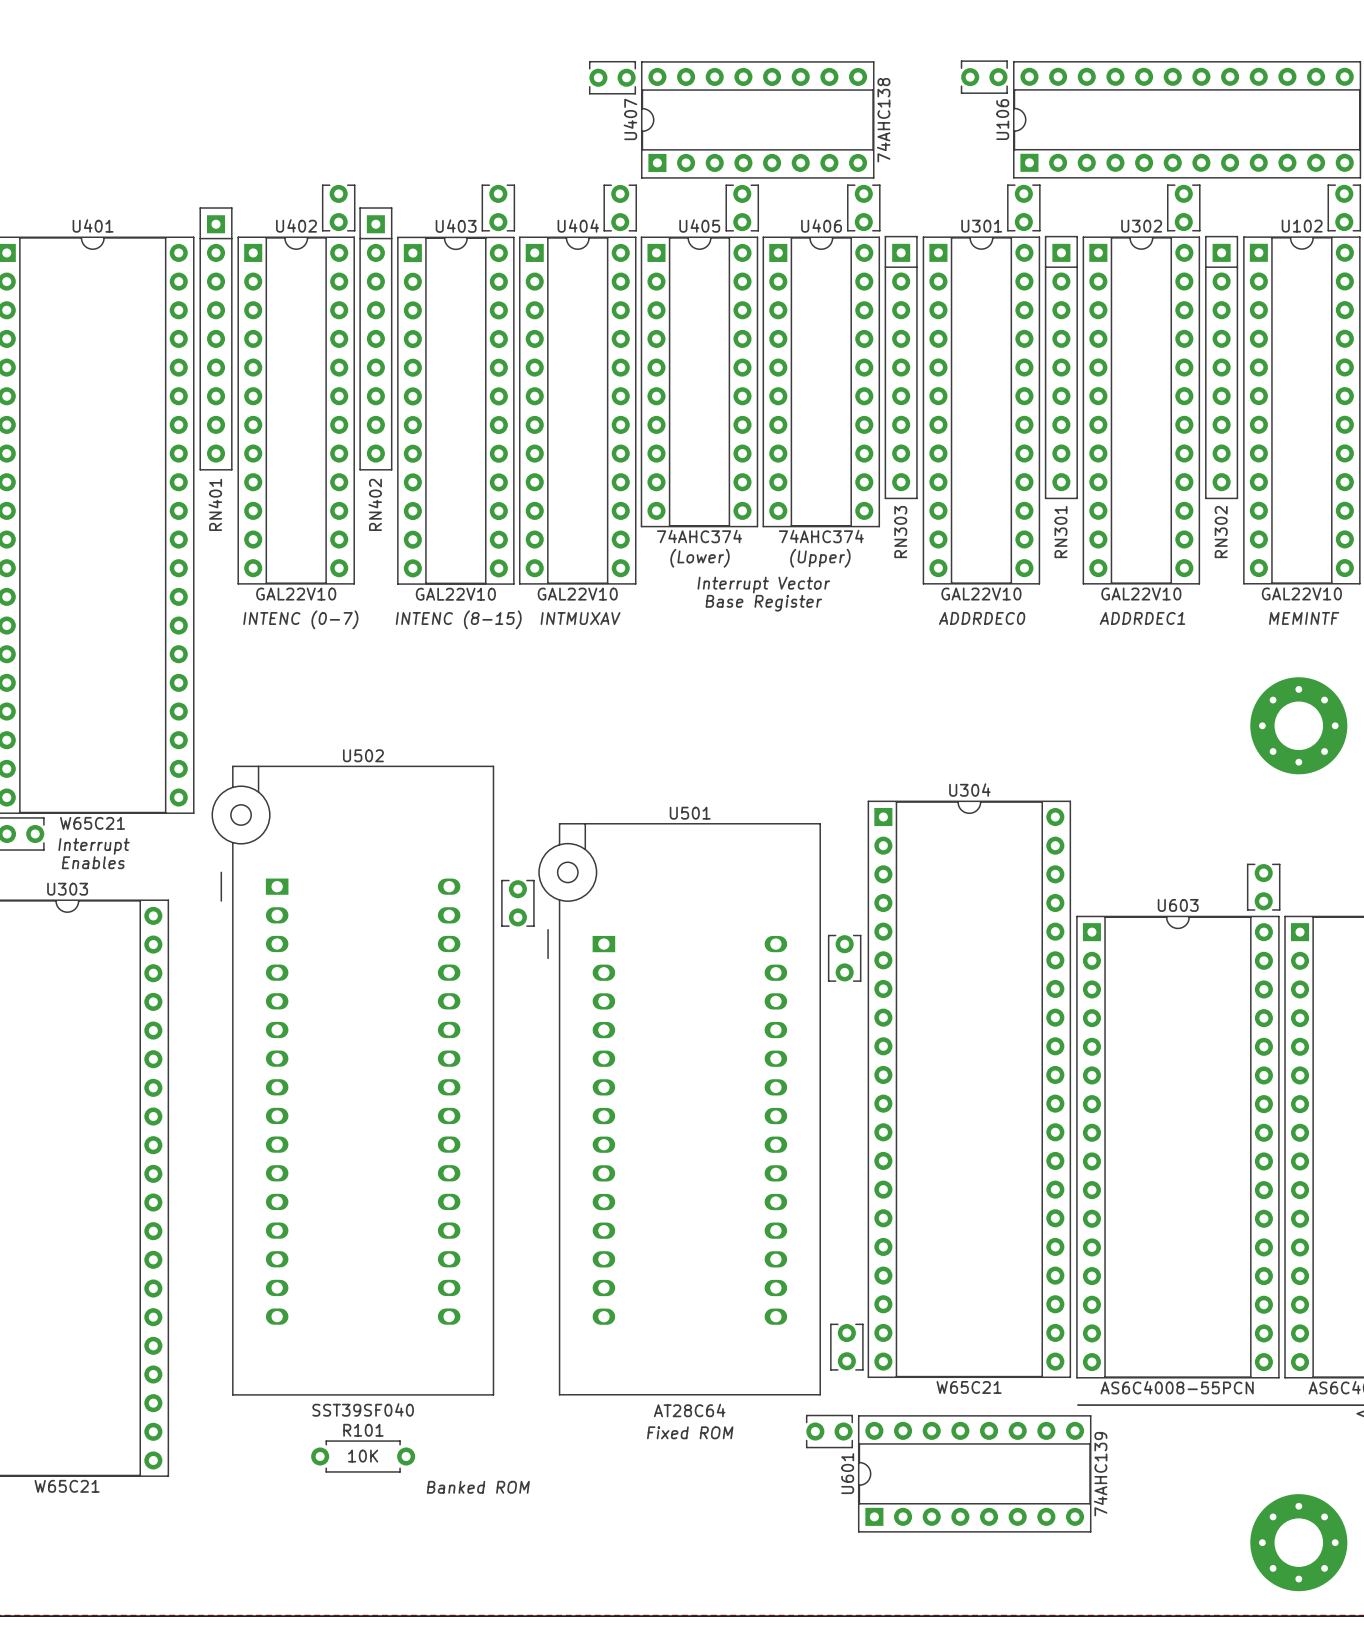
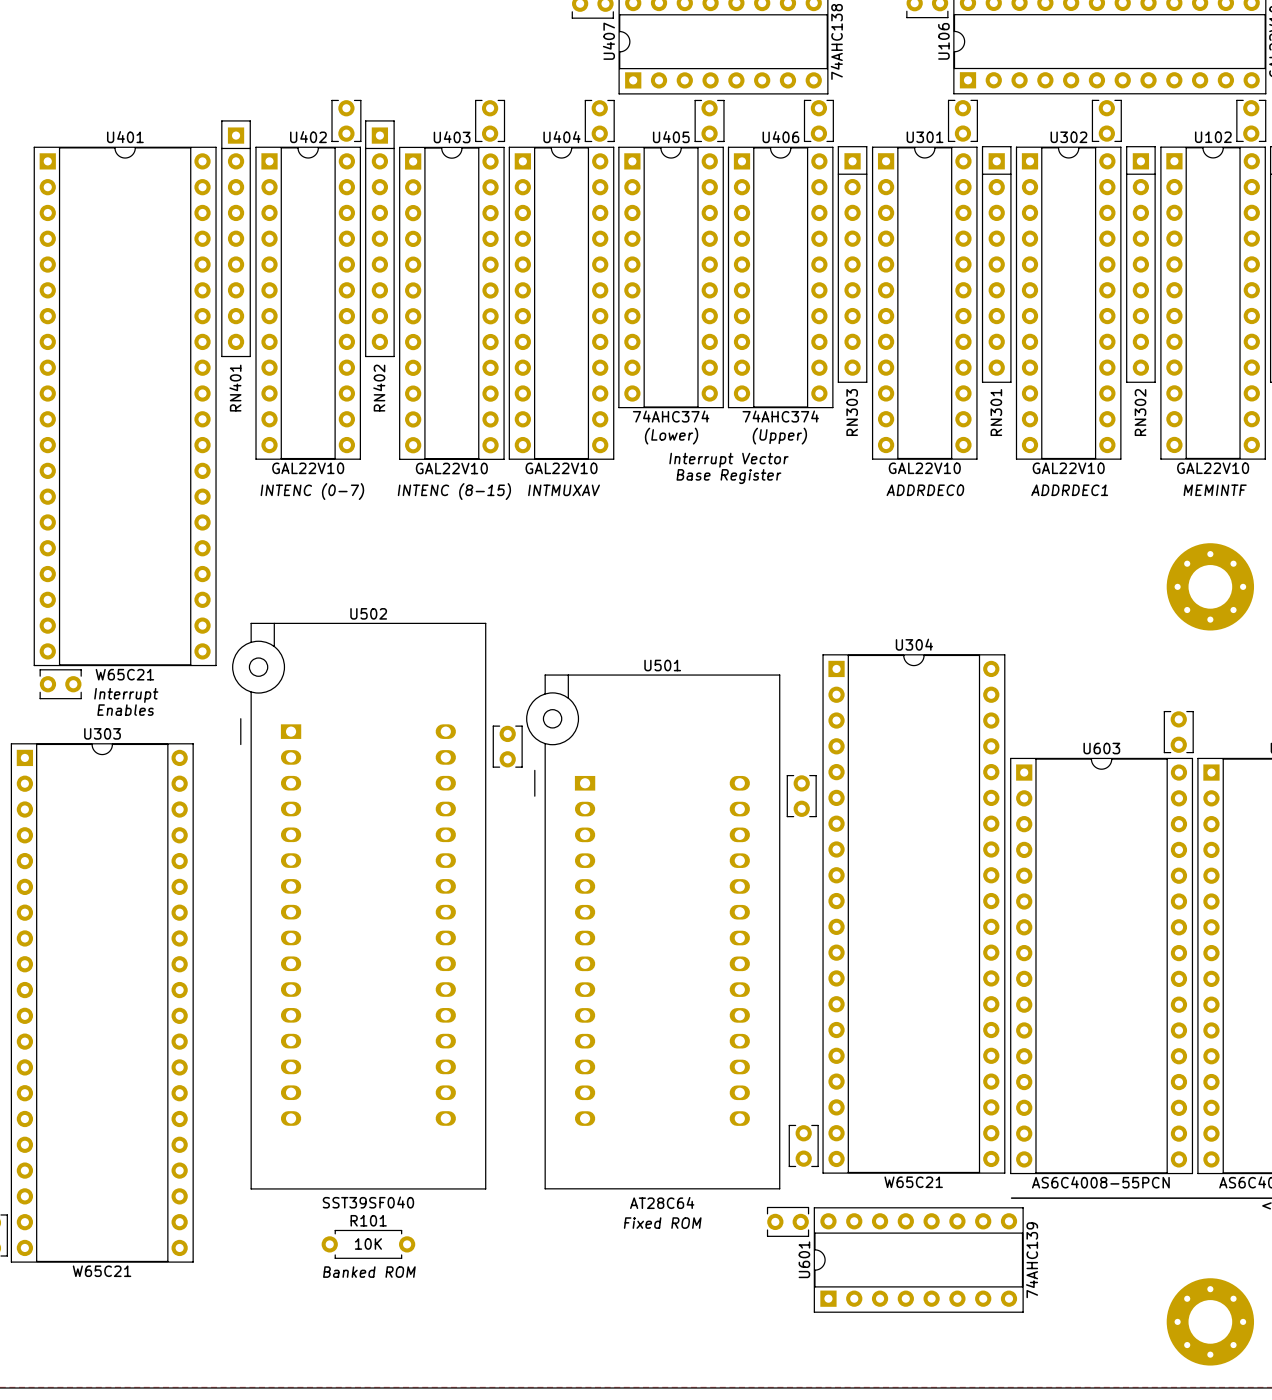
text position: Banked ROM (478, 1487) -> Banked ROM (369, 1272)

